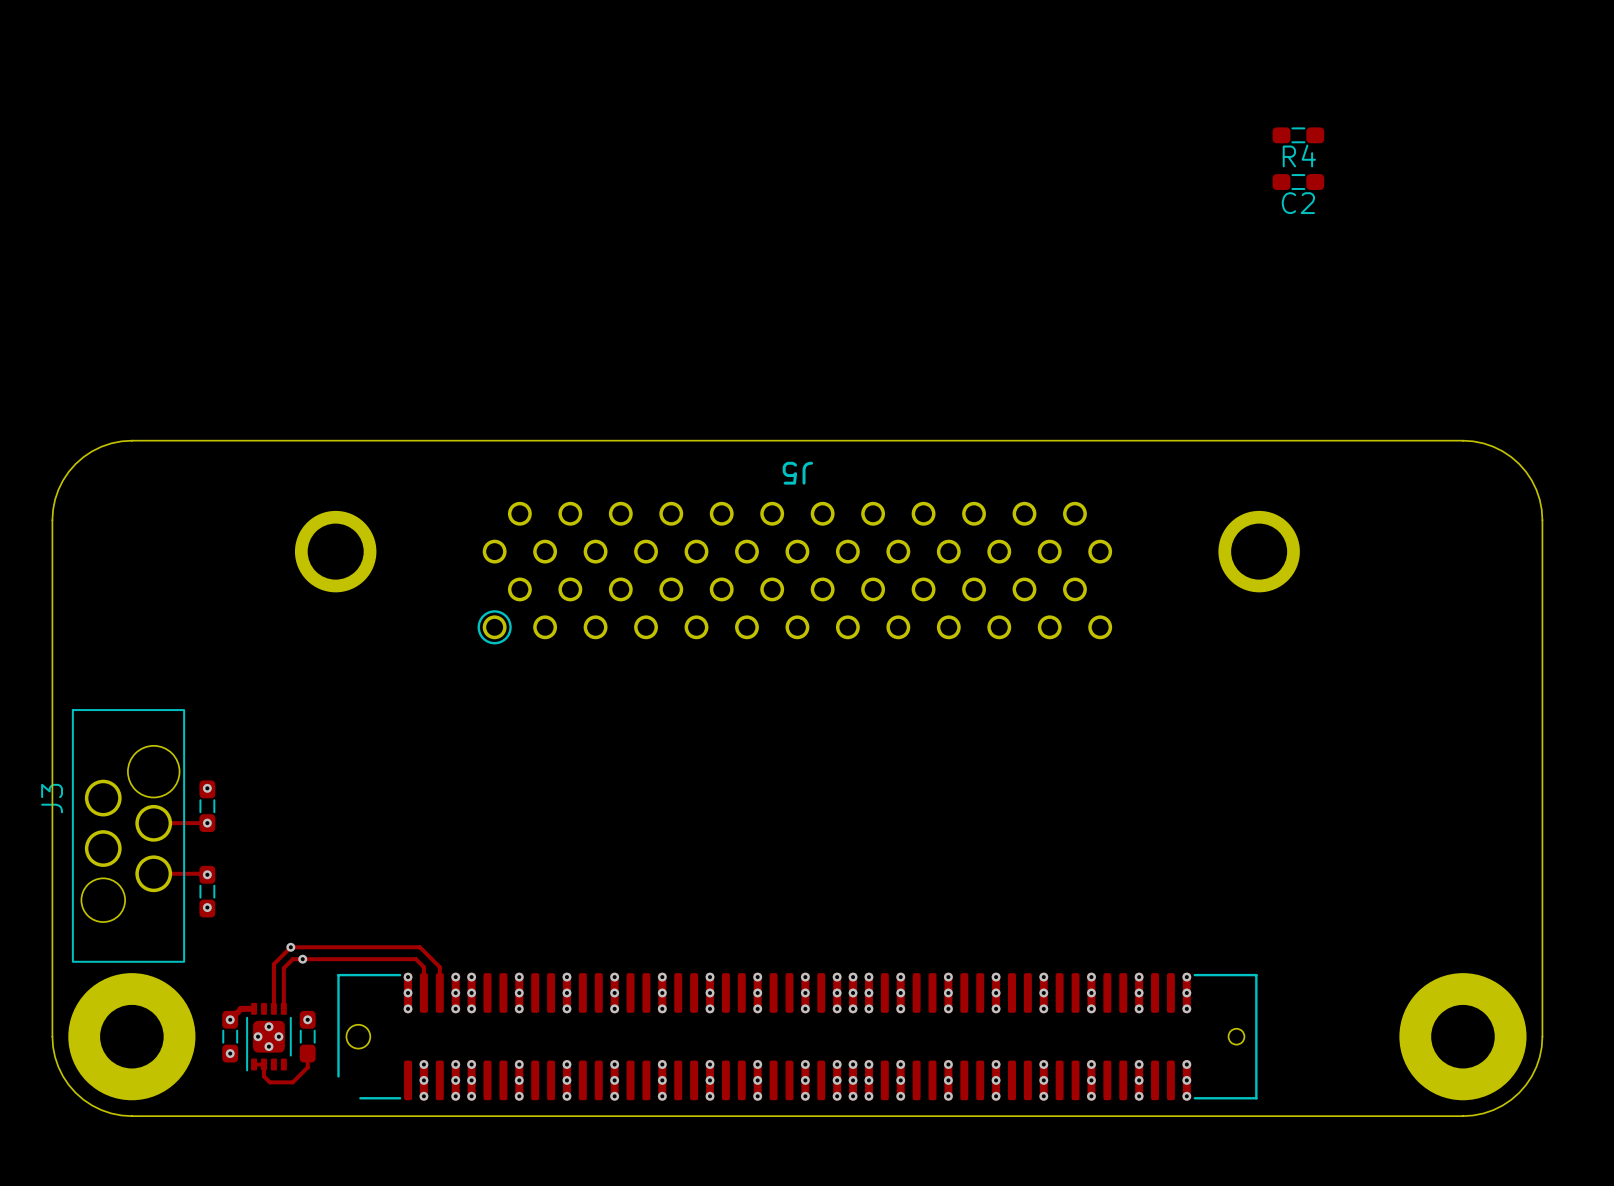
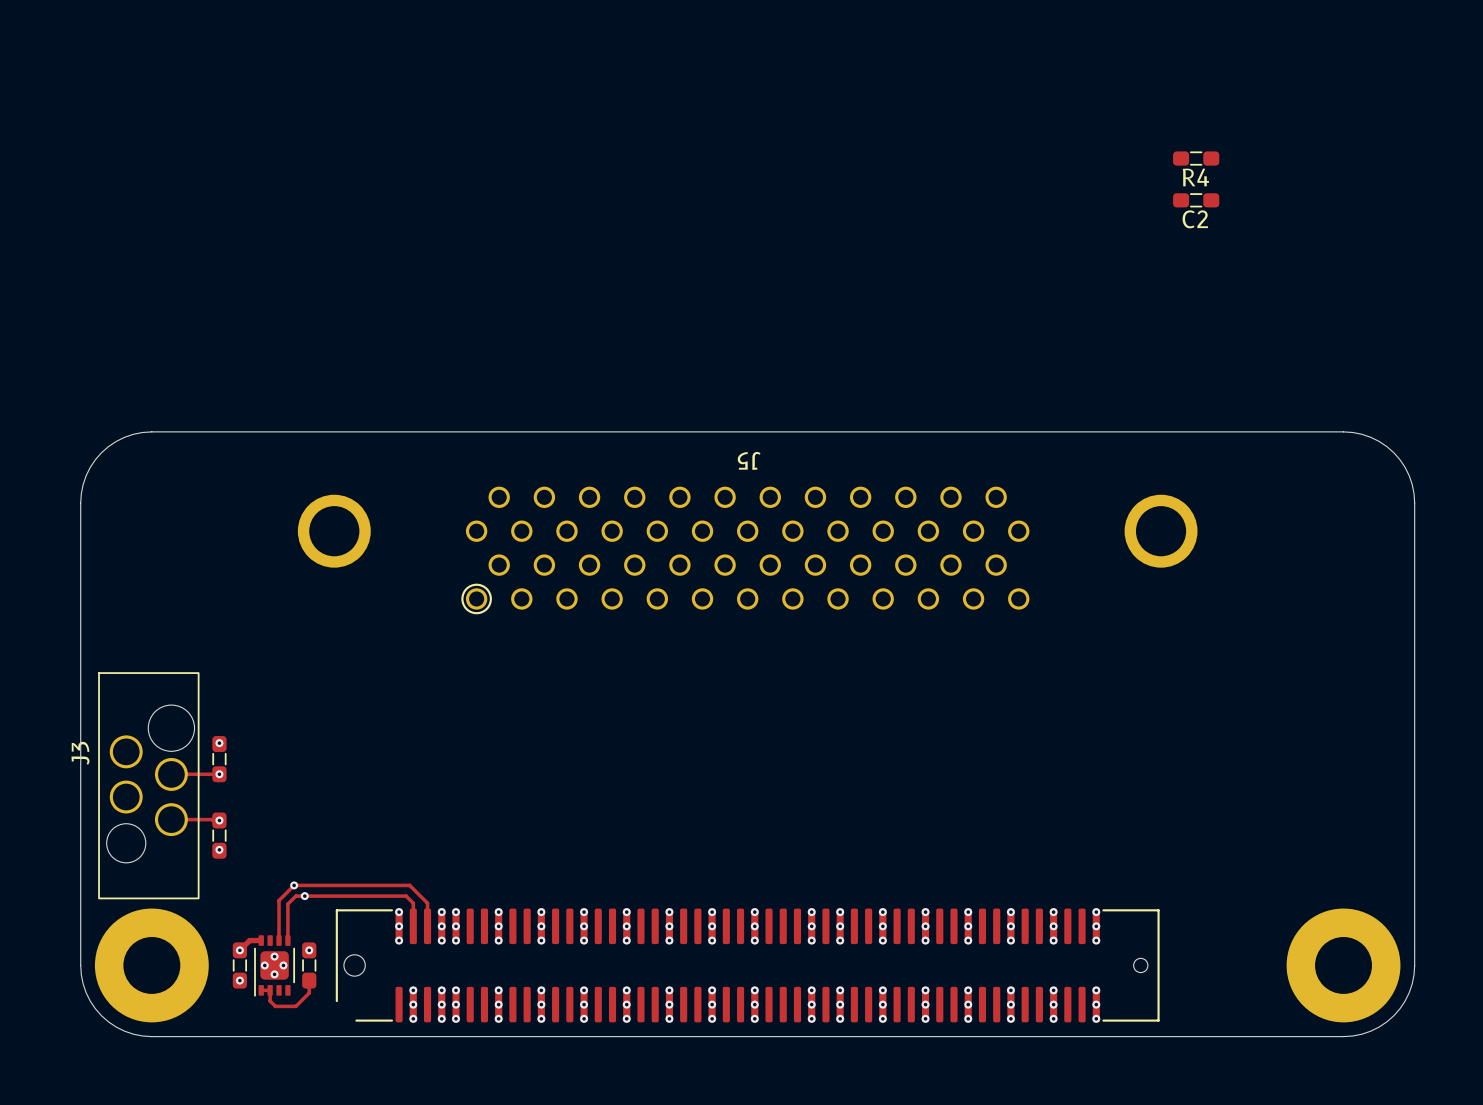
via: (837, 977) -> none
via: (853, 977) -> none
via: (837, 992) -> none
via: (853, 992) -> none
via: (837, 1008) -> none
via: (853, 1008) -> none
via: (837, 1064) -> none
via: (853, 1064) -> none
via: (837, 1080) -> none
via: (853, 1080) -> none
via: (837, 1096) -> none
via: (853, 1096) -> none

